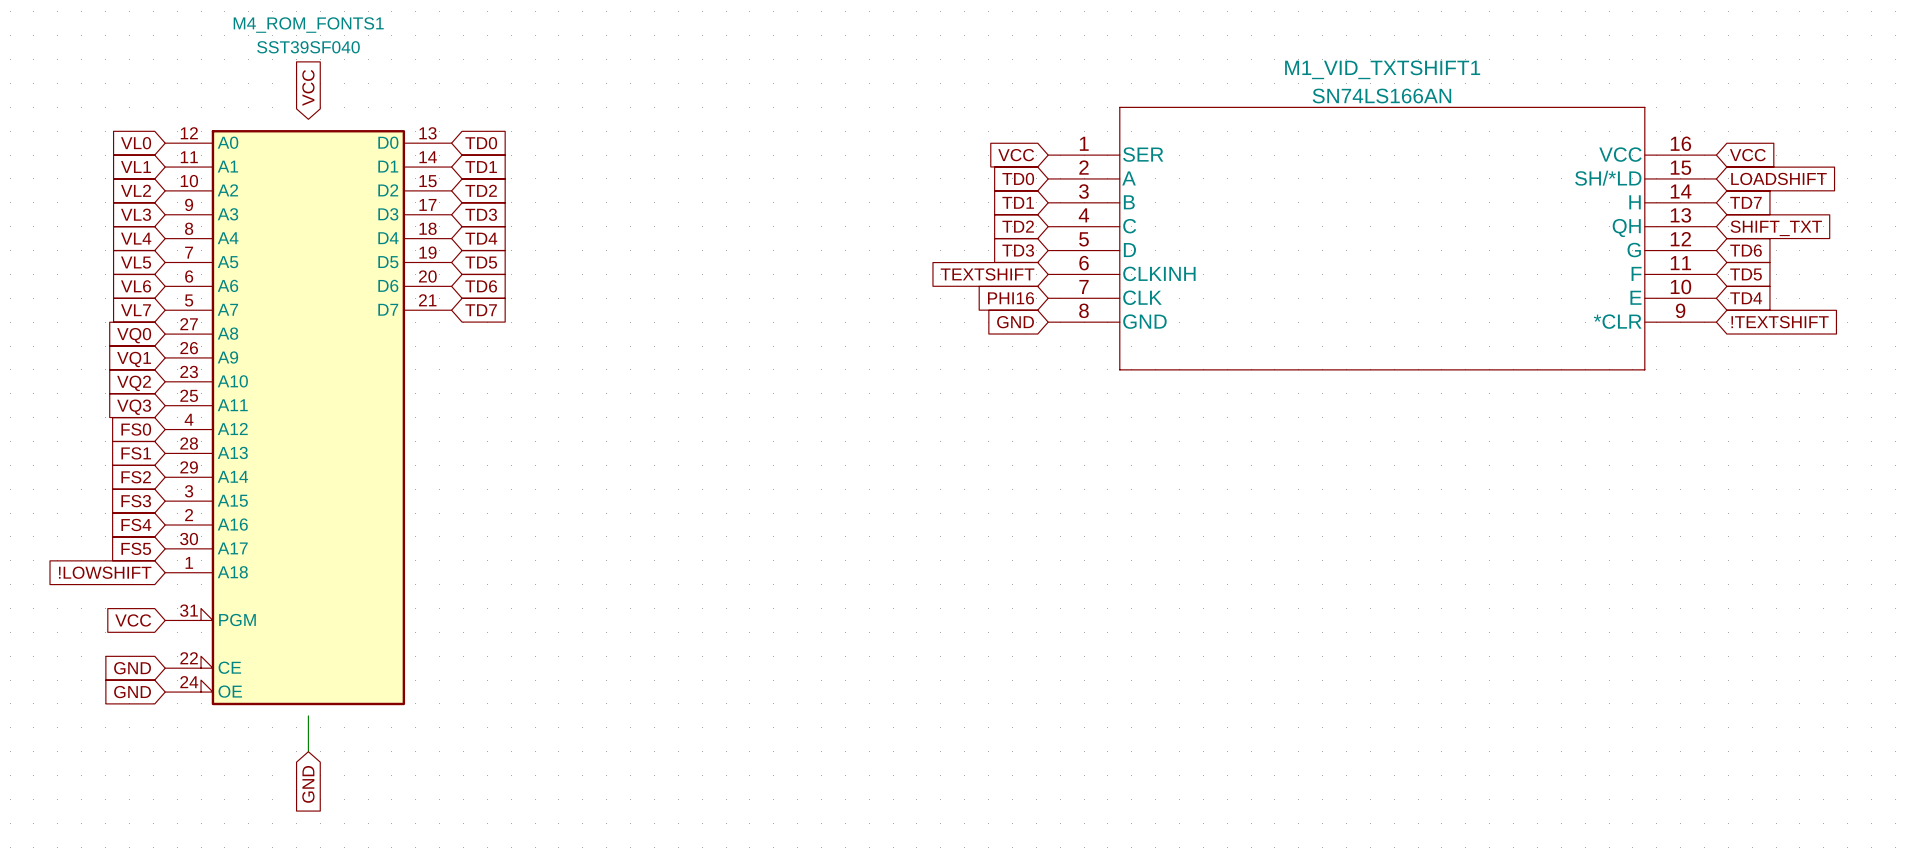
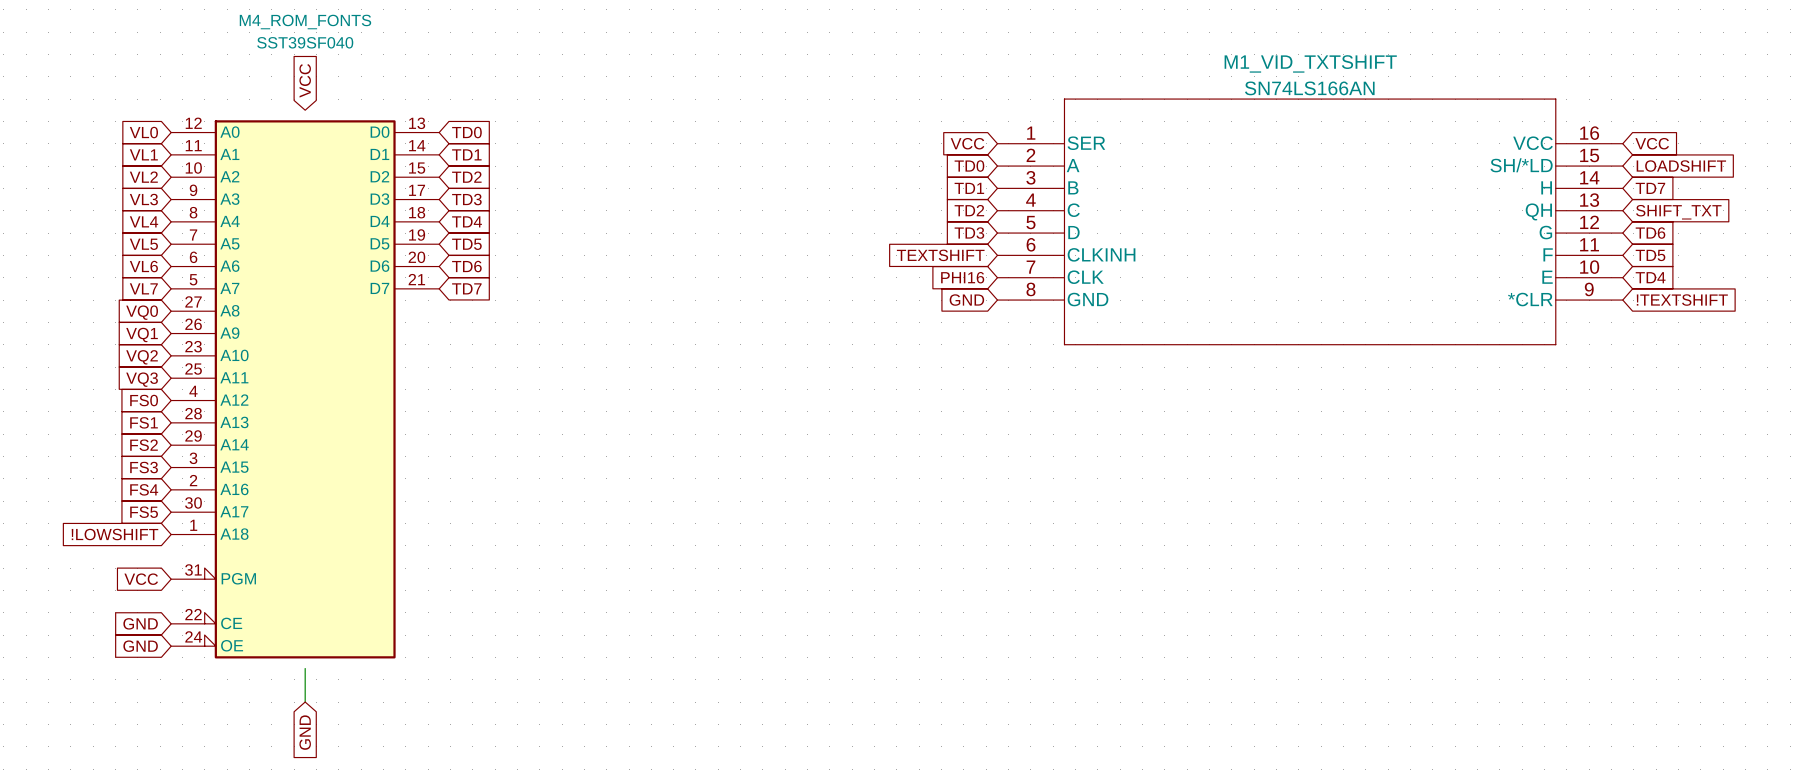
M4_ROM_FONTS1 name: M4_ROM_FONTS1 (308, 25) -> M4_ROM_FONTS (305, 22)
M1_VID_TXTSHIFT1 name: M1_VID_TXTSHIFT1 (1382, 69) -> M1_VID_TXTSHIFT (1310, 63)

